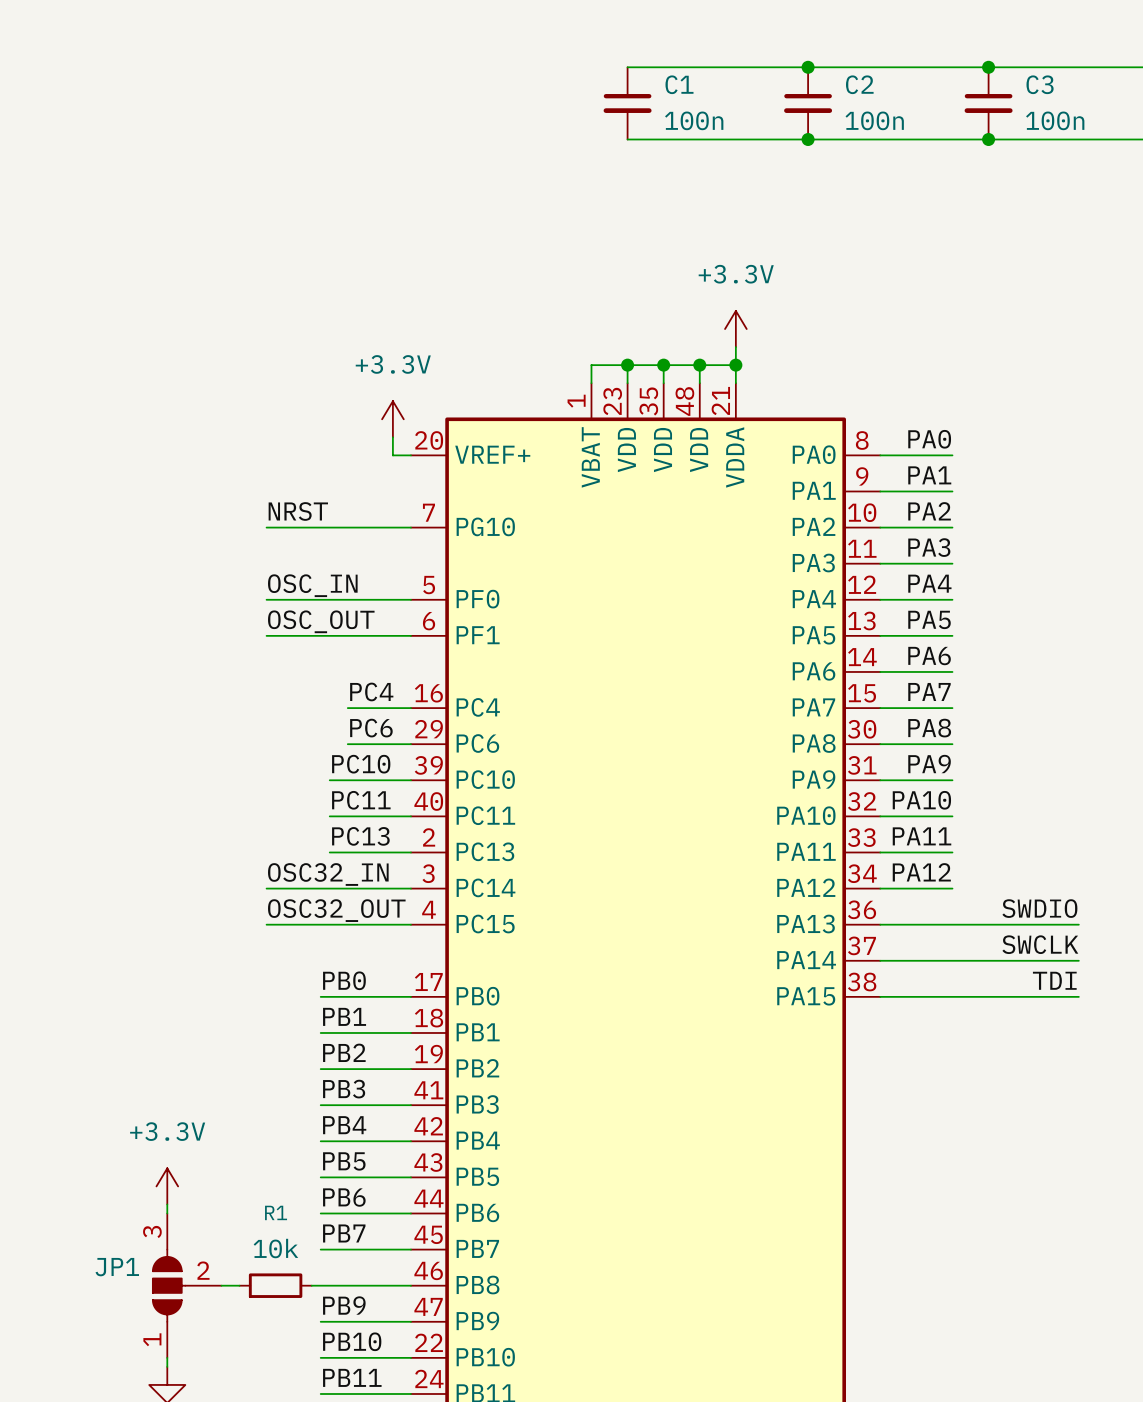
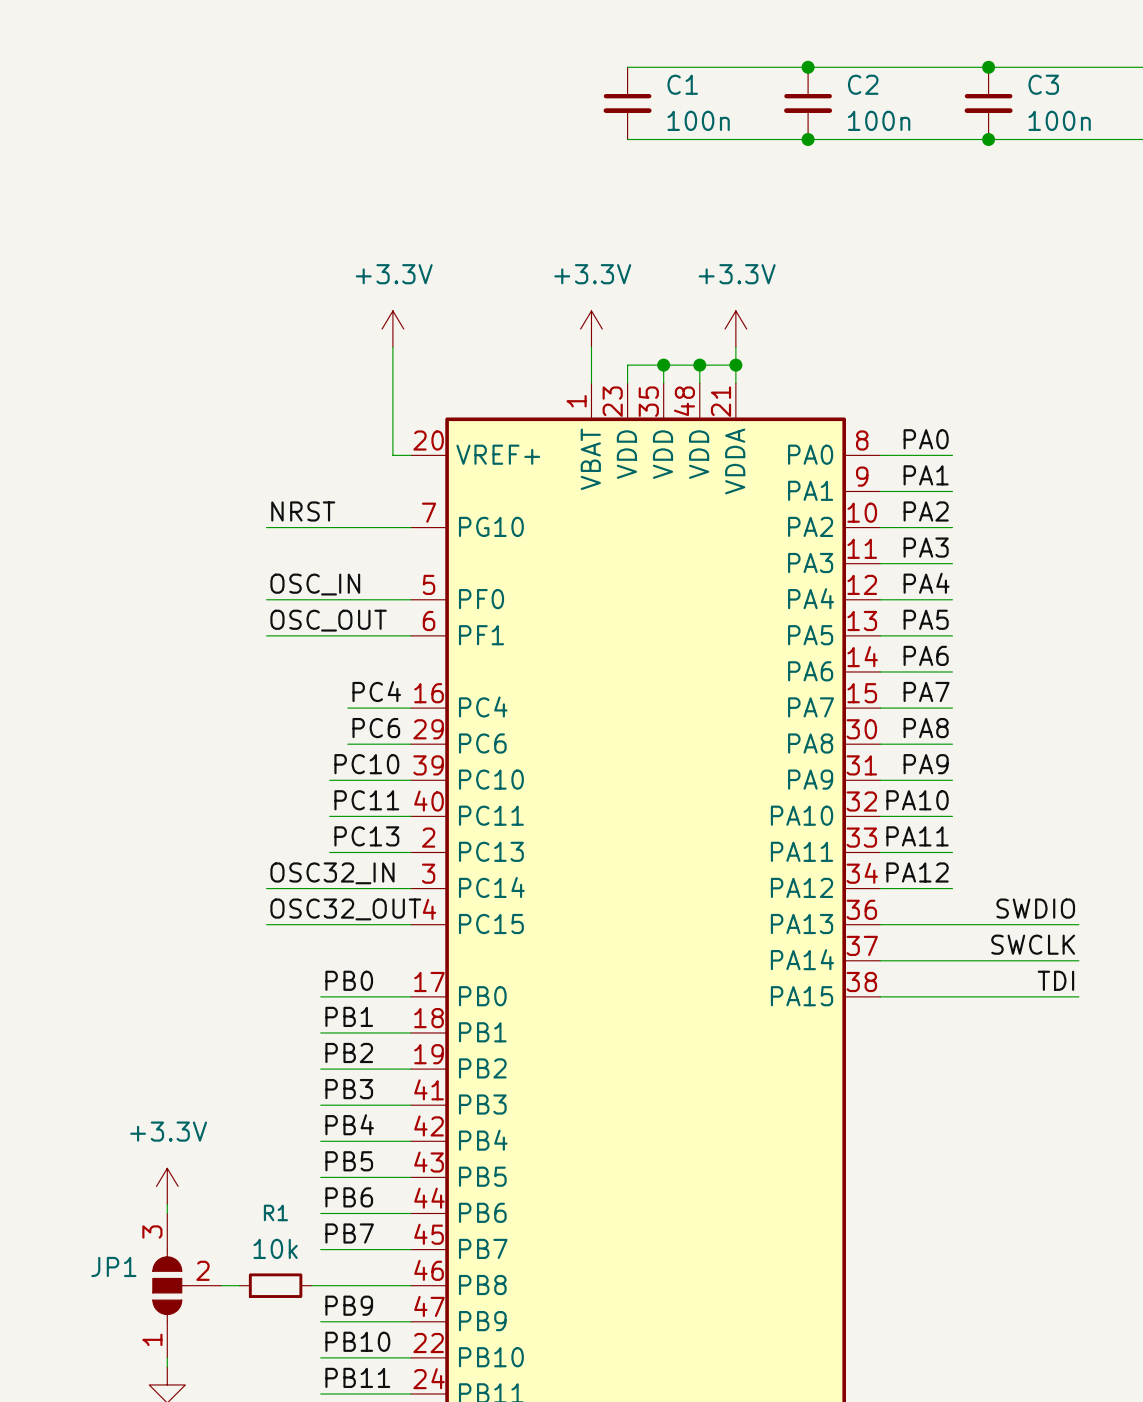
power symbol: none -> +3.3V (591, 329)
wire: none -> (392, 347) (392, 437)
wire: (591, 365) (627, 365) -> (591, 365) (591, 347)
junction: (627, 365) -> none
power symbol position: +3.3V (392, 419) -> +3.3V (392, 329)

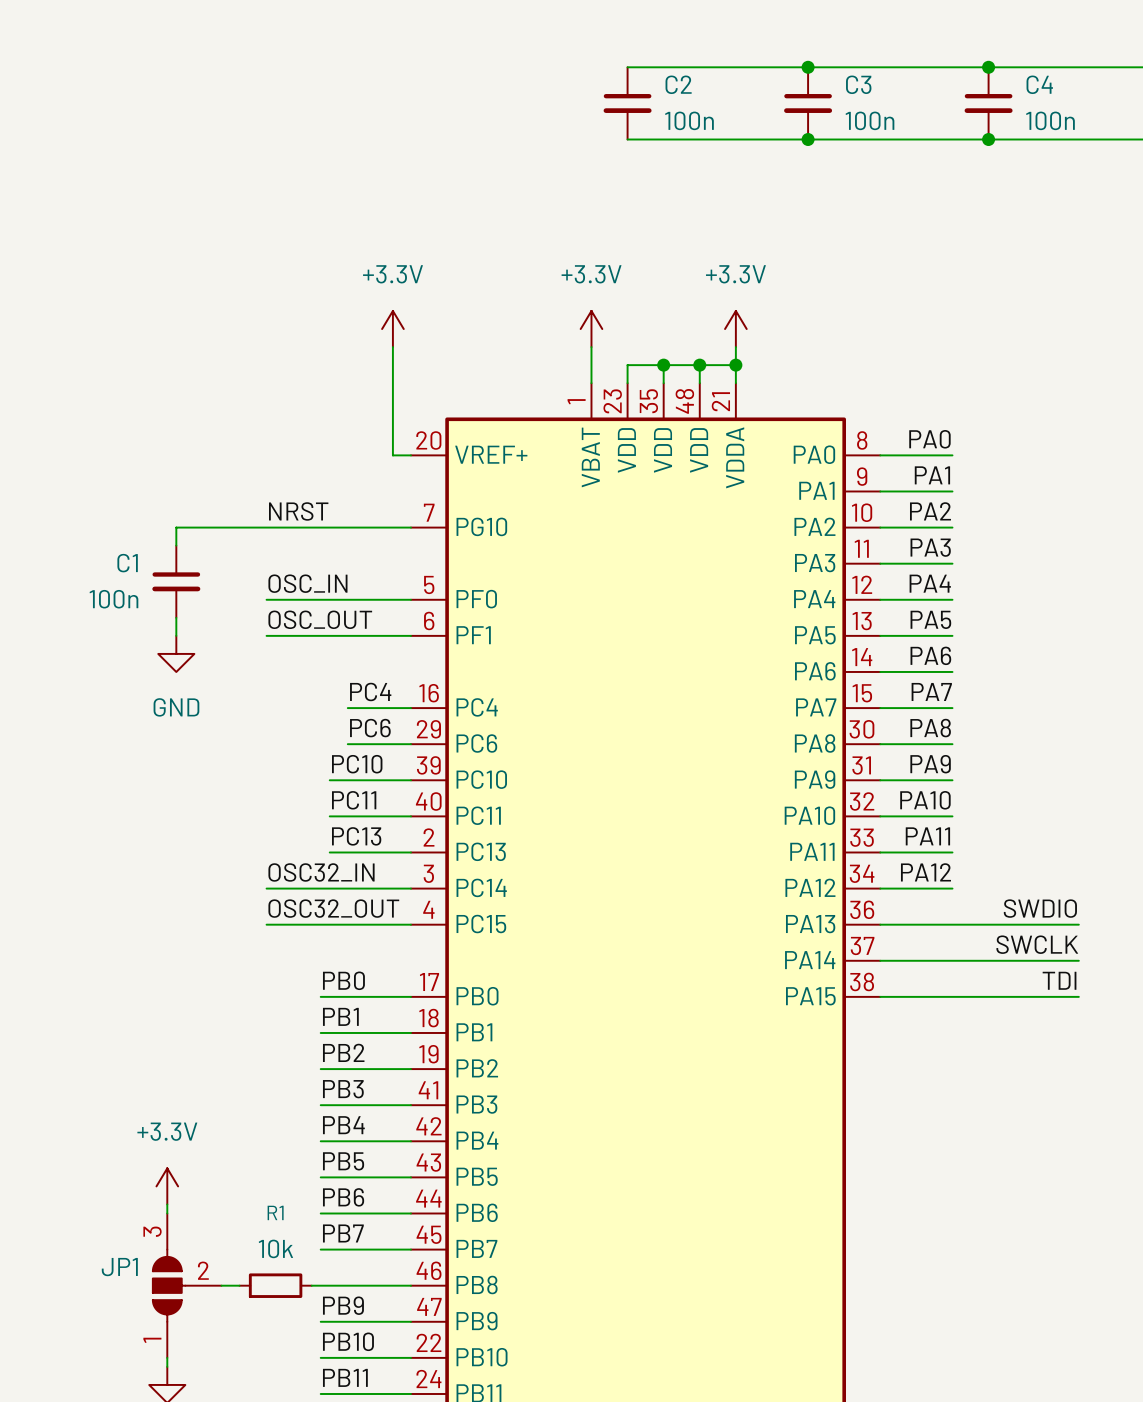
C1 name: C1 (682, 84) -> C2 (678, 84)
C2 name: C2 (863, 84) -> C3 (858, 84)
C3 name: C3 (1043, 84) -> C4 (1039, 84)
wire: none -> (266, 527) (176, 527) (176, 545)
C1: none -> 100n (176, 581)
wire: none -> (176, 617) (176, 635)
power symbol: none -> GND (176, 653)

